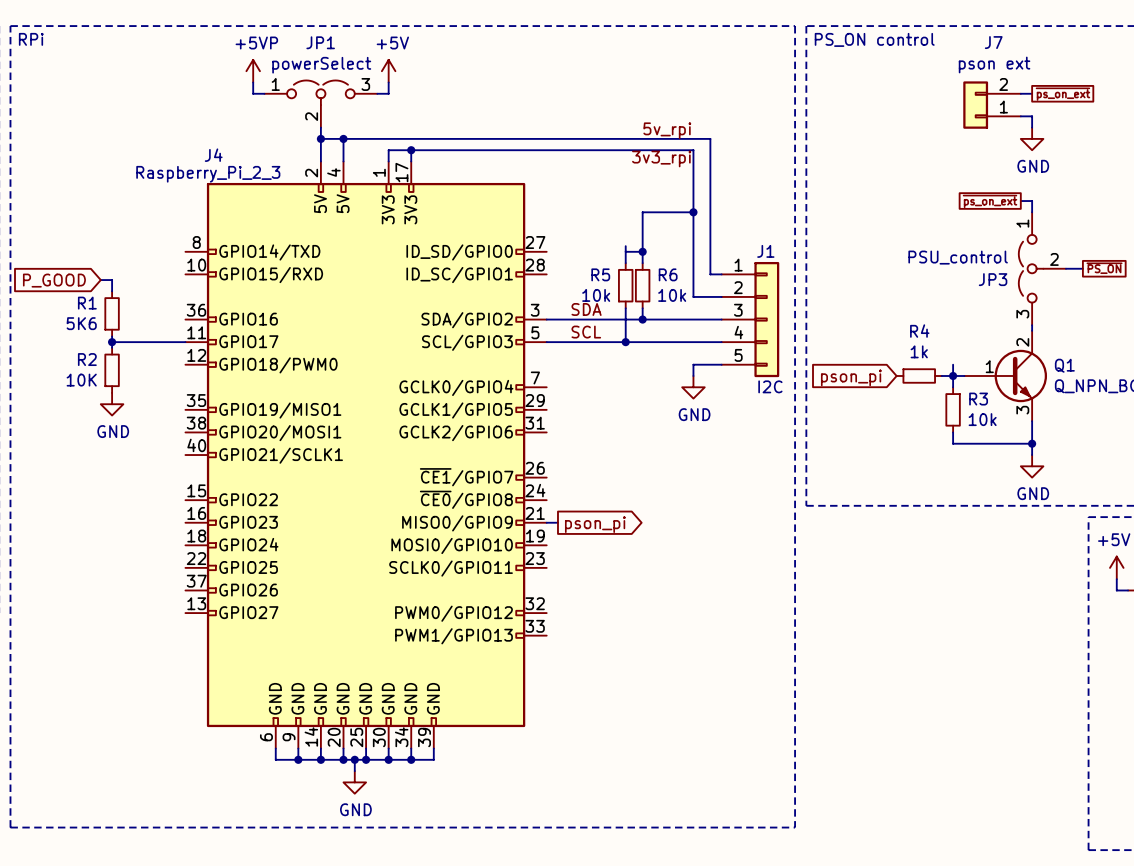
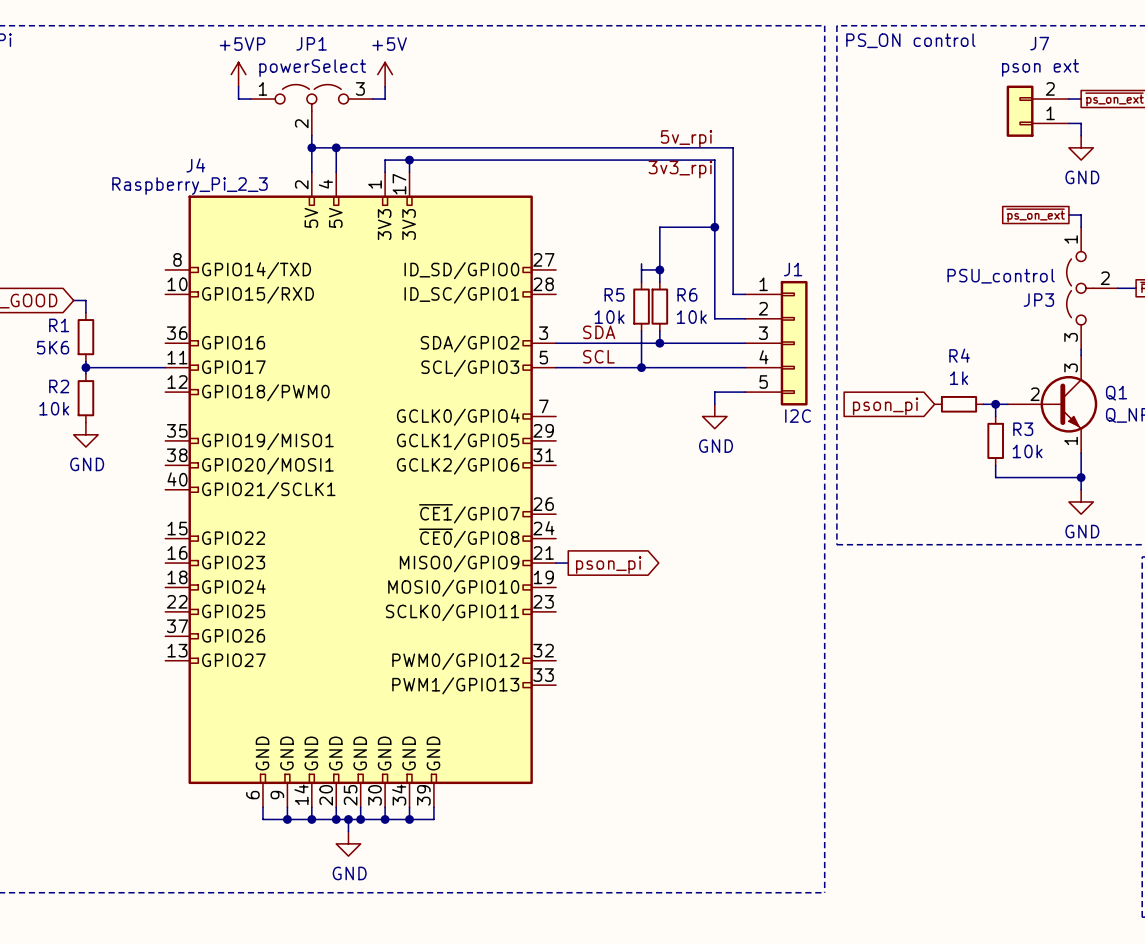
Q1 pin number: 2 (1022, 342) -> 3 (1071, 367)
wire: (953, 364) (953, 375) -> none
Q1 pin number: 1 (989, 366) -> 2 (1035, 394)
R2 value: 10K (81, 380) -> 10k (54, 408)
Q1 pin number: 3 (1022, 410) -> 1 (1071, 440)

